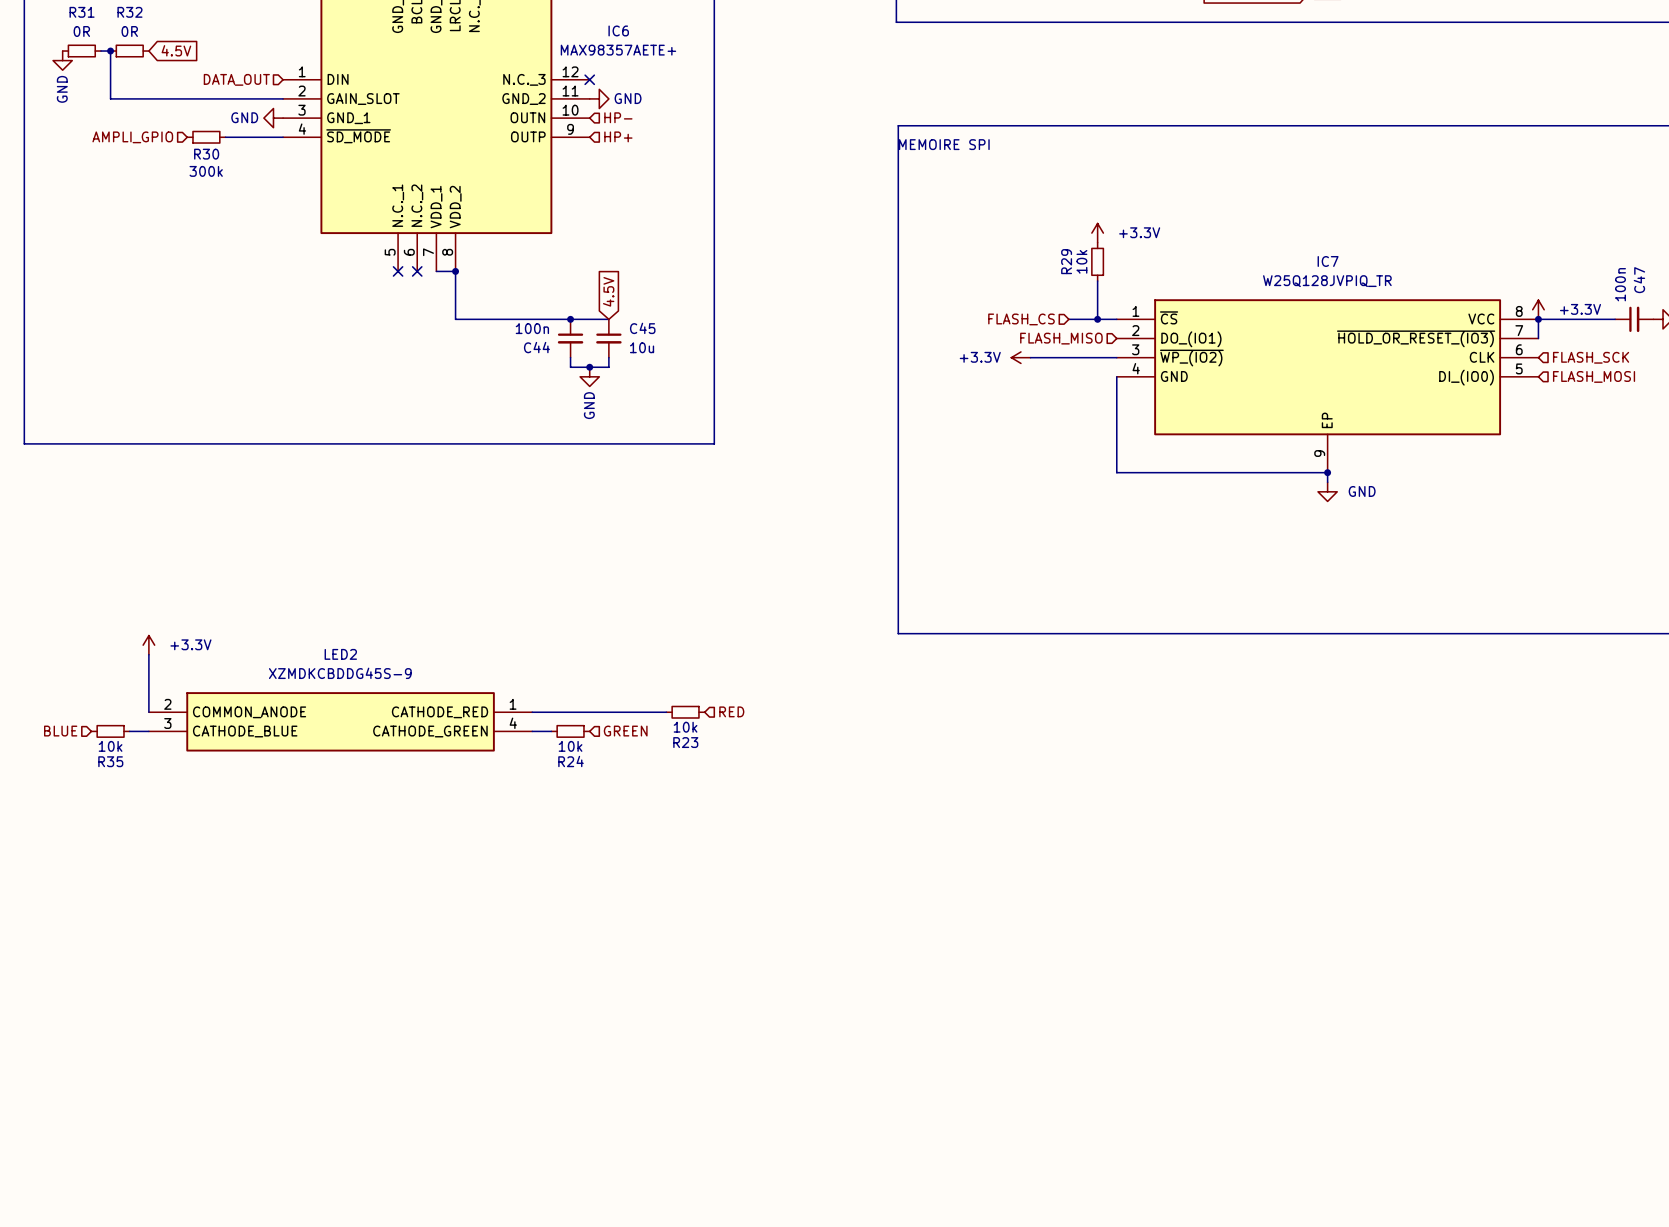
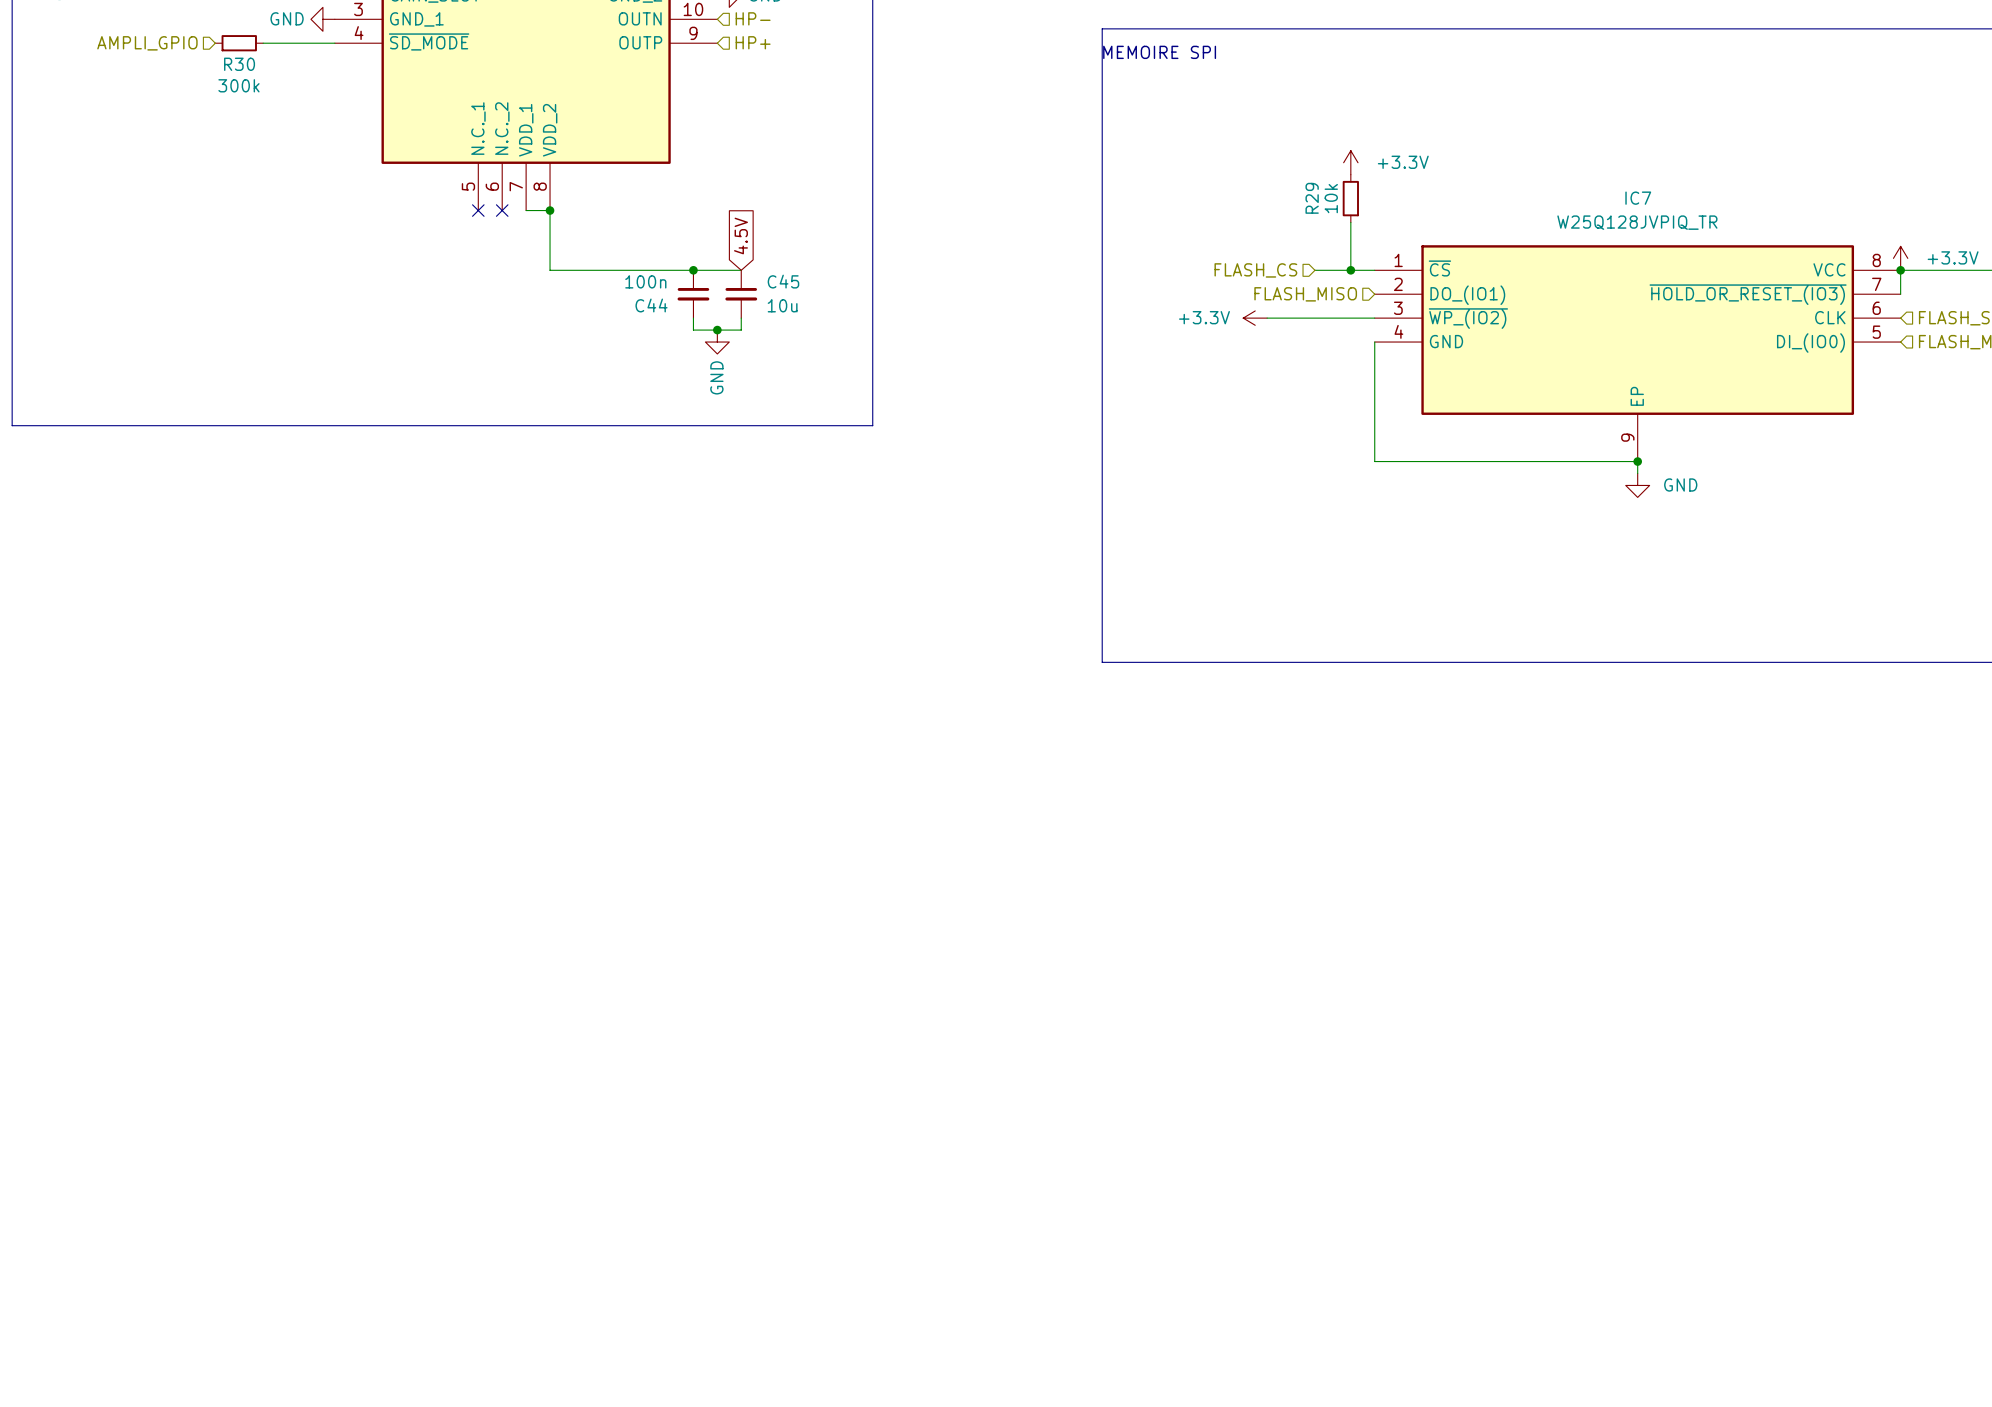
power symbol: +3.3V (148, 645) -> none
wire: (148, 654) (148, 712) -> none
hierarchical label: RED (731, 711) -> none
wire: (532, 712) (666, 712) -> none
R23: 10k (685, 712) -> none
LED2: XZMDKCBDDG45S-9 (340, 721) -> none
hierarchical label: BLUE (60, 731) -> none
R35: 10k (110, 731) -> none
wire: (129, 731) (148, 731) -> none
wire: (532, 731) (551, 731) -> none
R24: 10k (570, 731) -> none
hierarchical label: GREEN (625, 731) -> none

